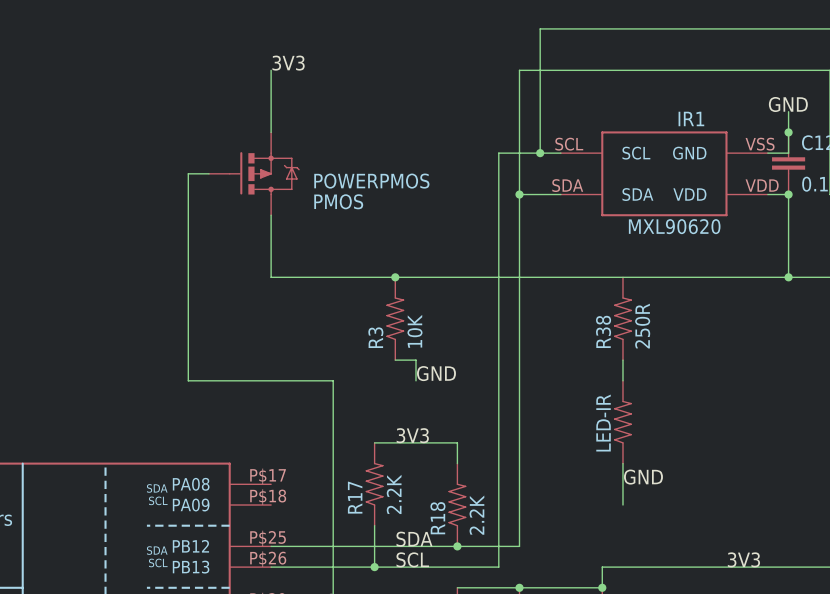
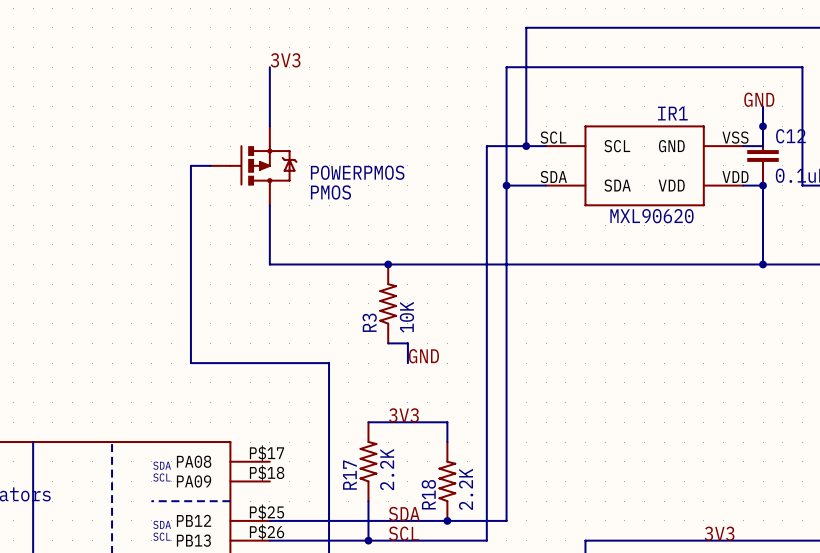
R38: 250R (622, 318) -> none
wire: (622, 360) (622, 380) -> none
LED-IR: (622, 422) -> none
wire: (622, 463) (622, 505) -> none
label: GND (643, 477) -> none

